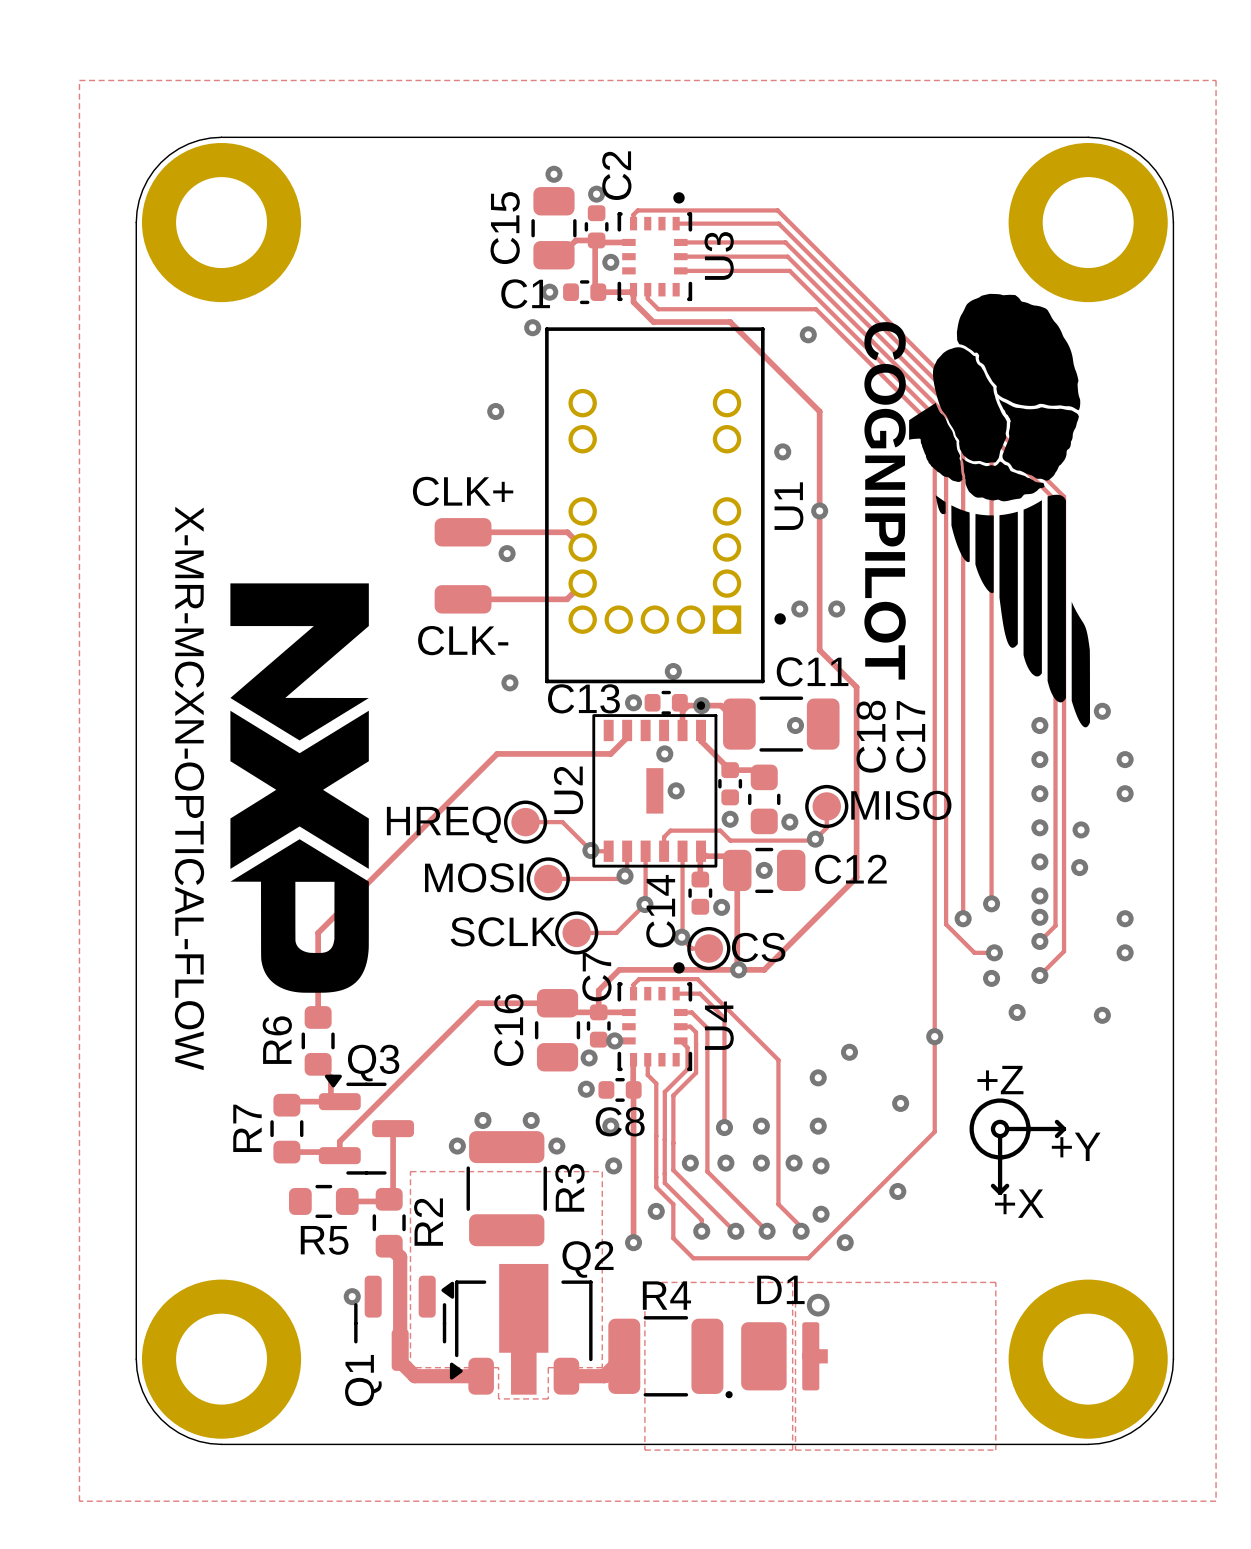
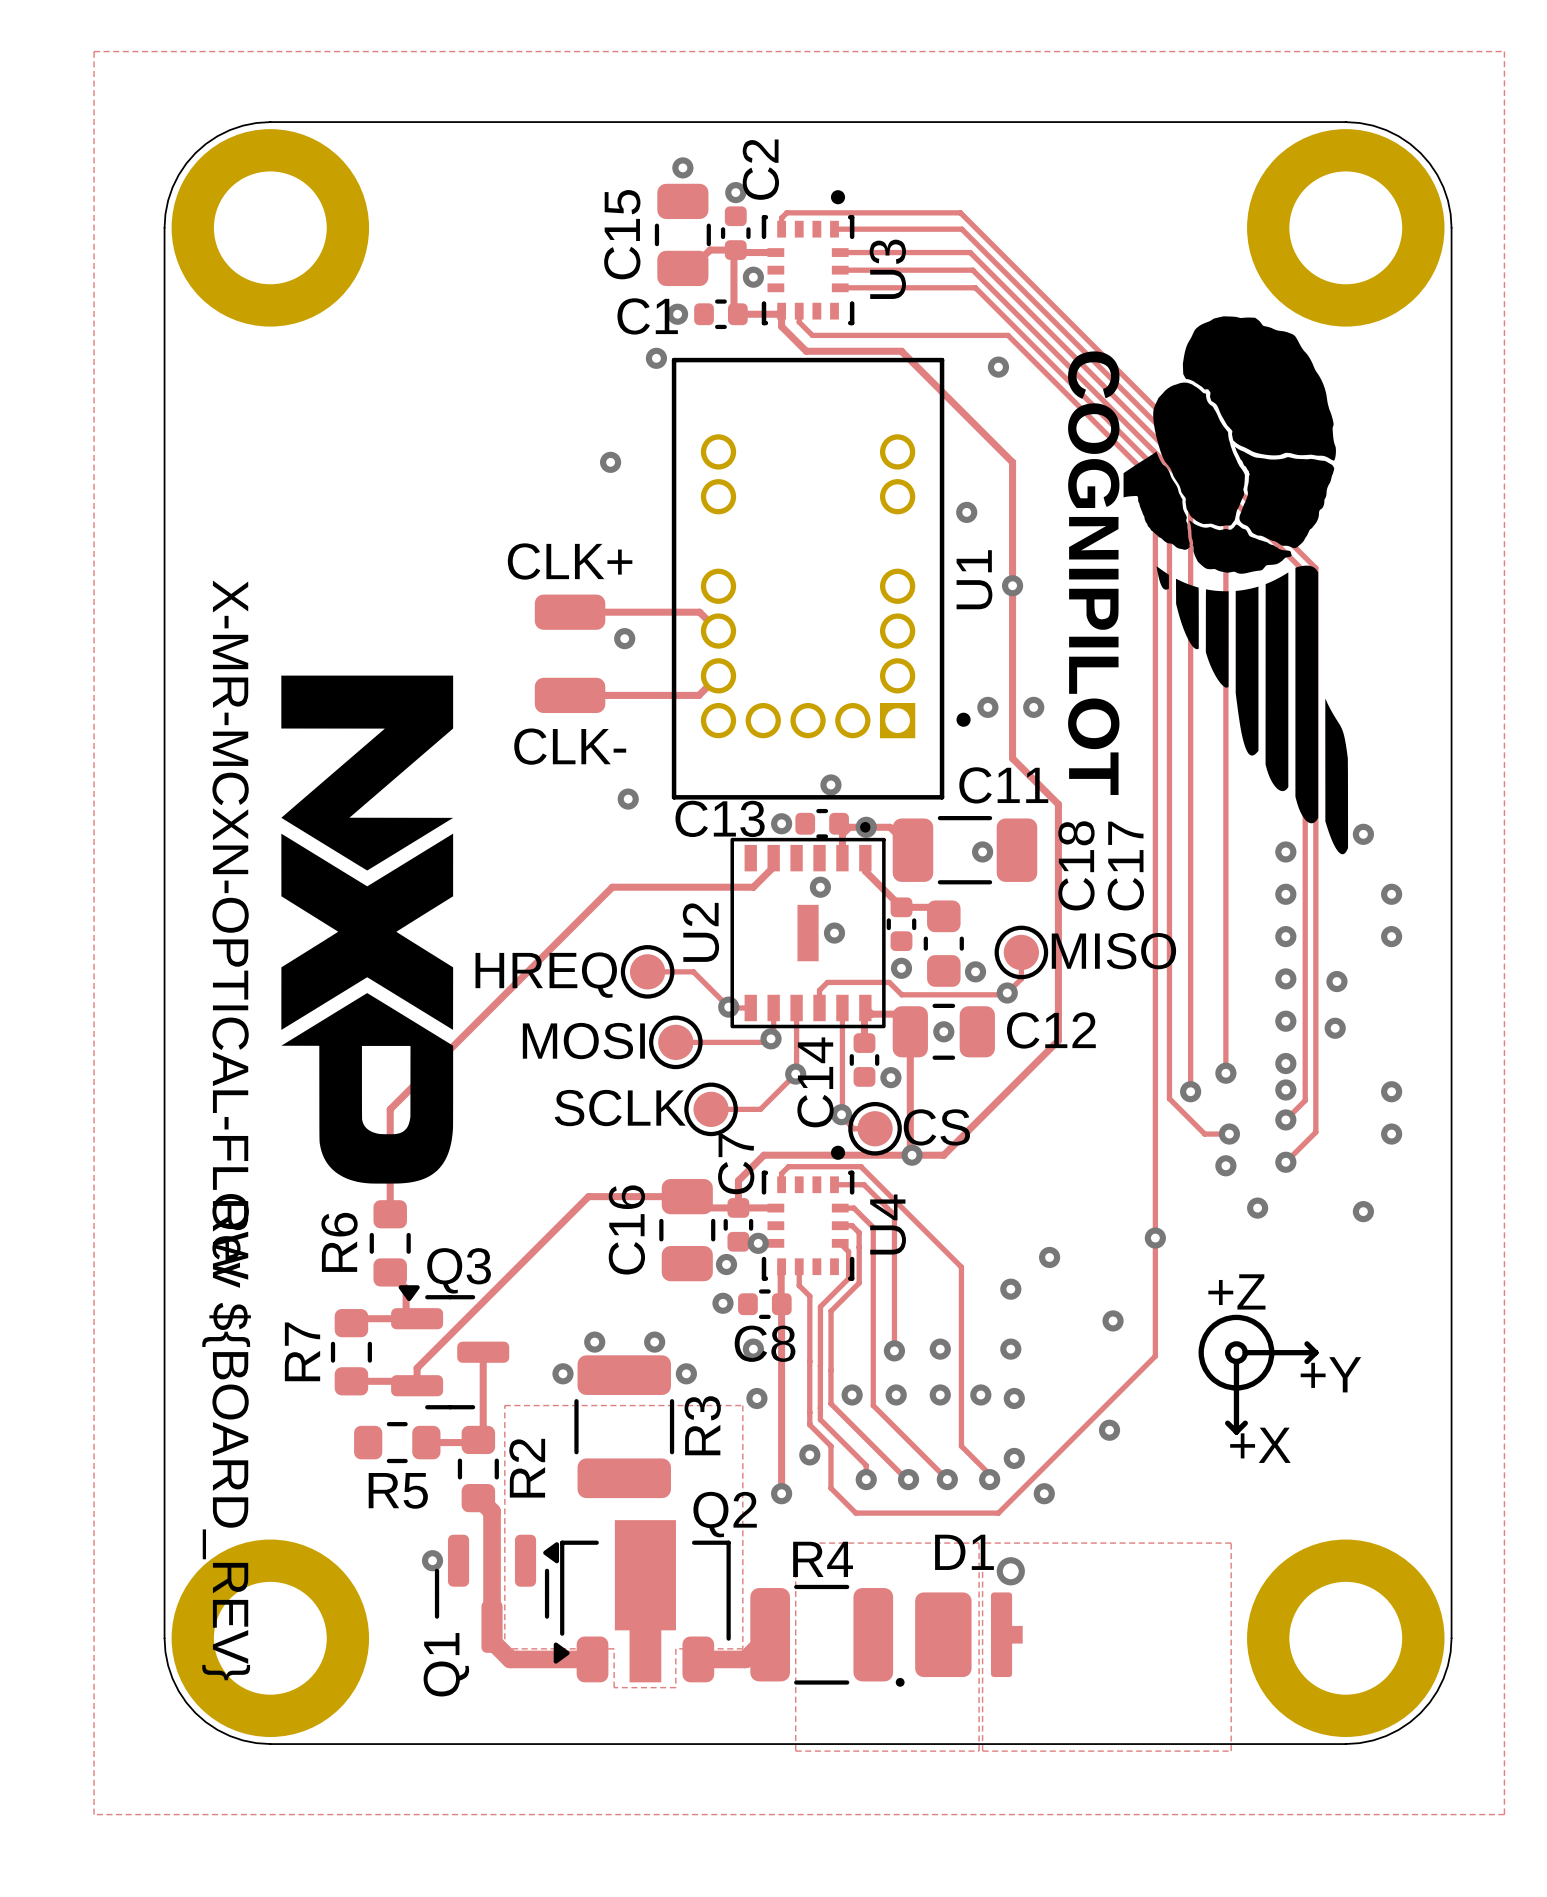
text: none -> Rev ${BOARD_REV} (226, 1440)

